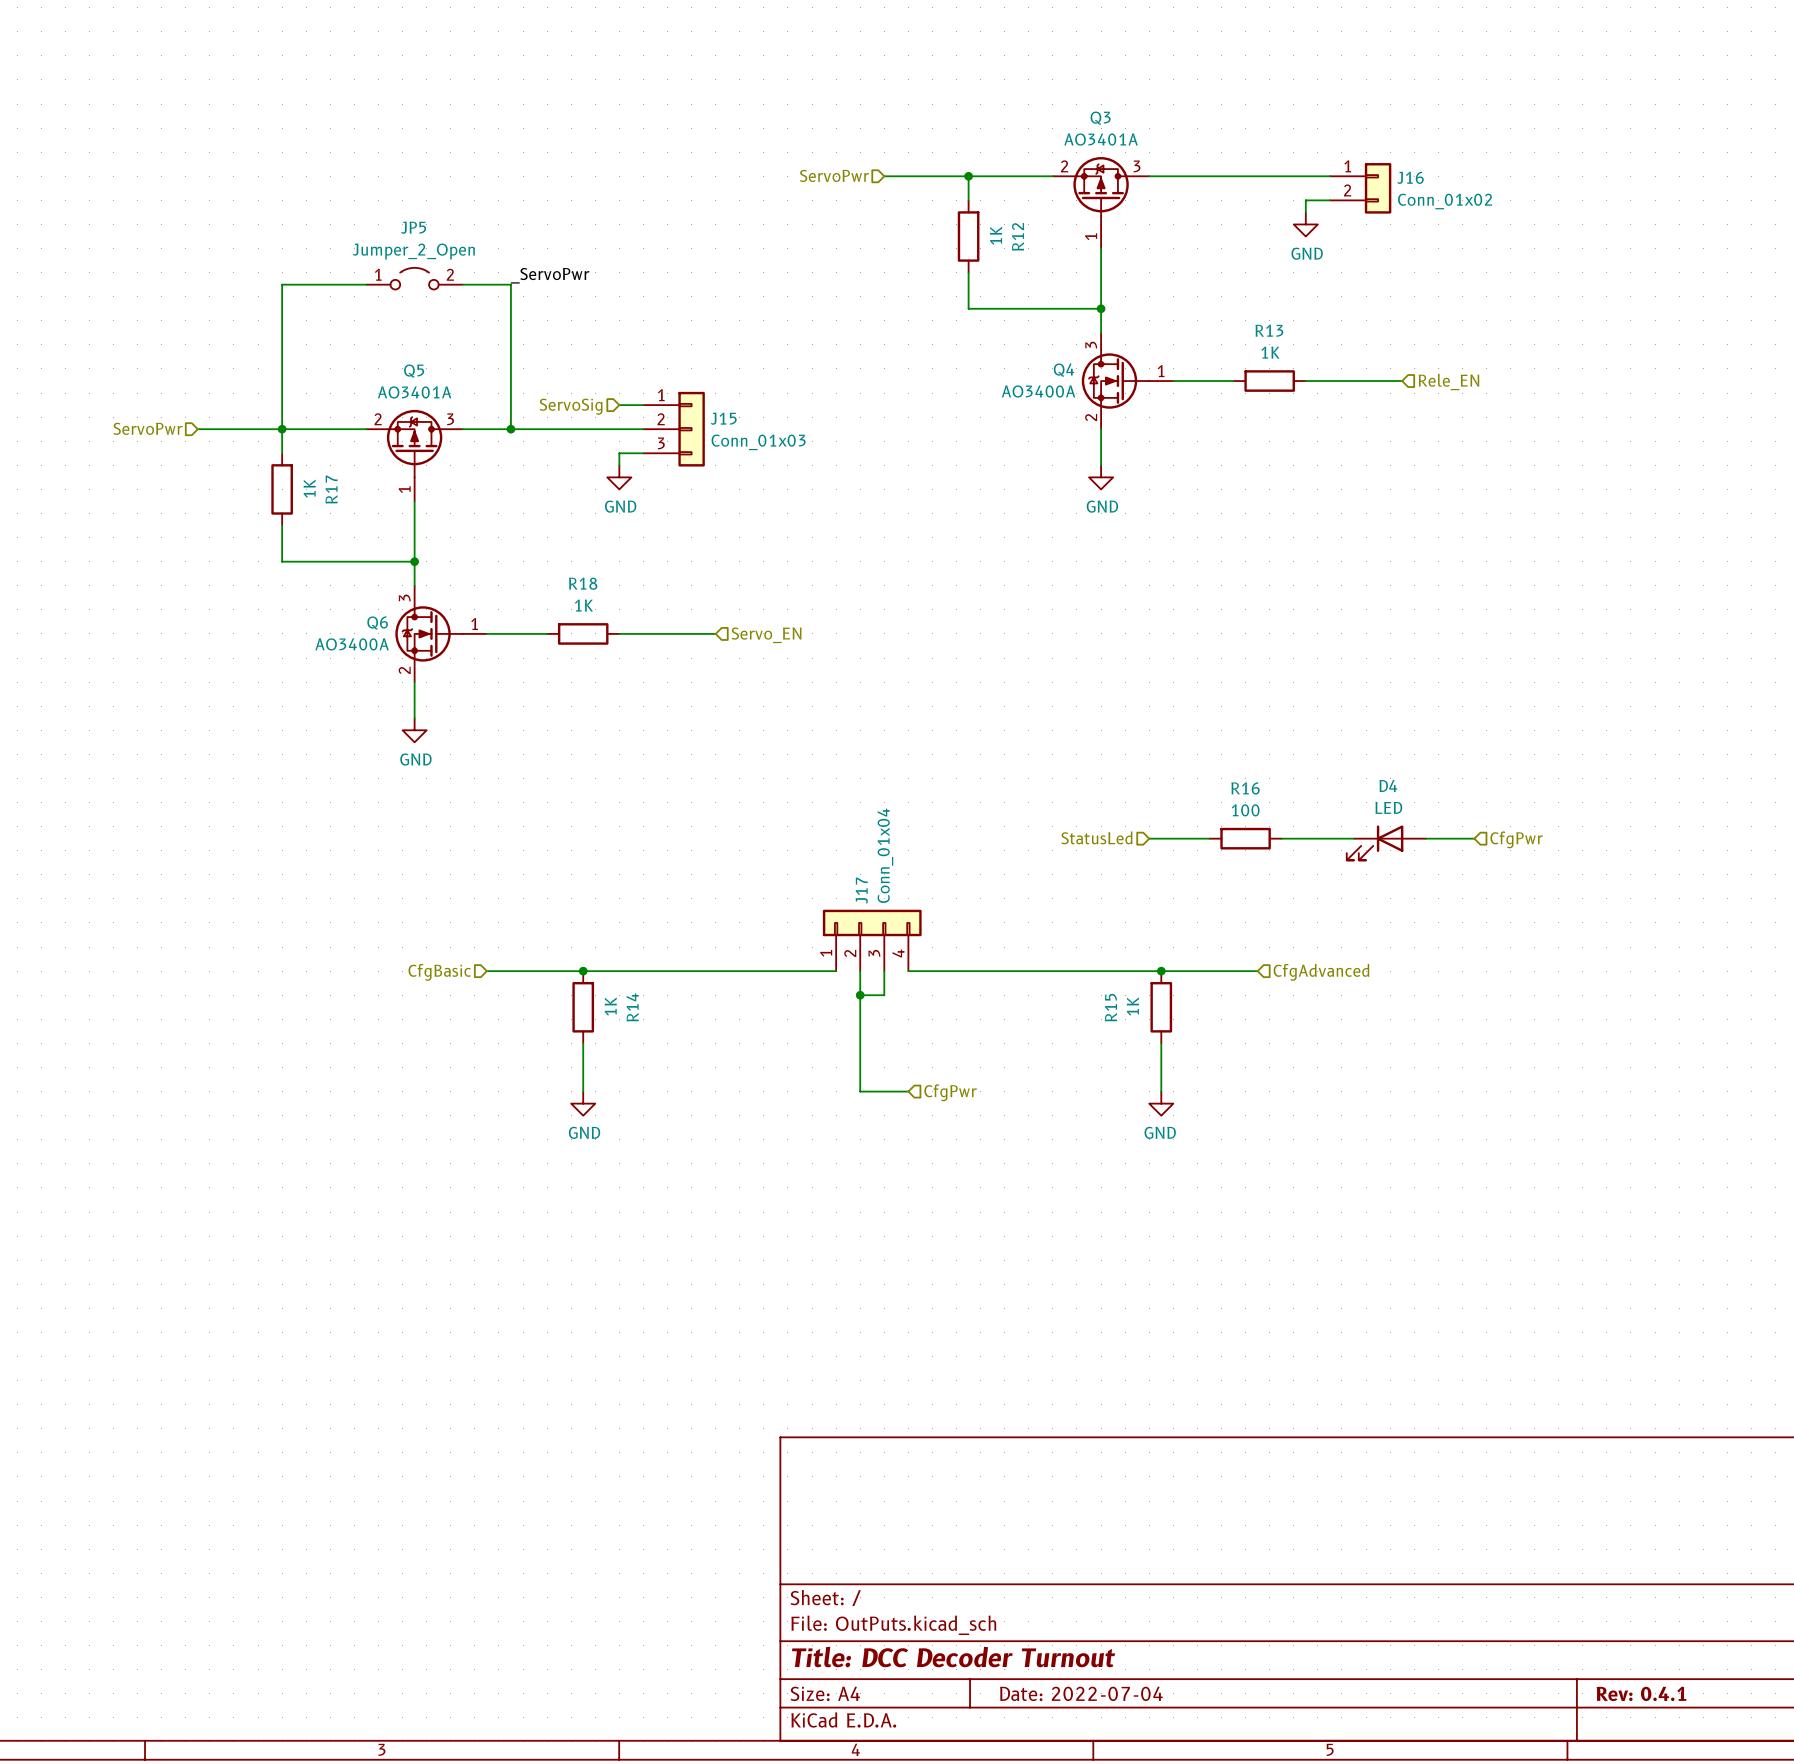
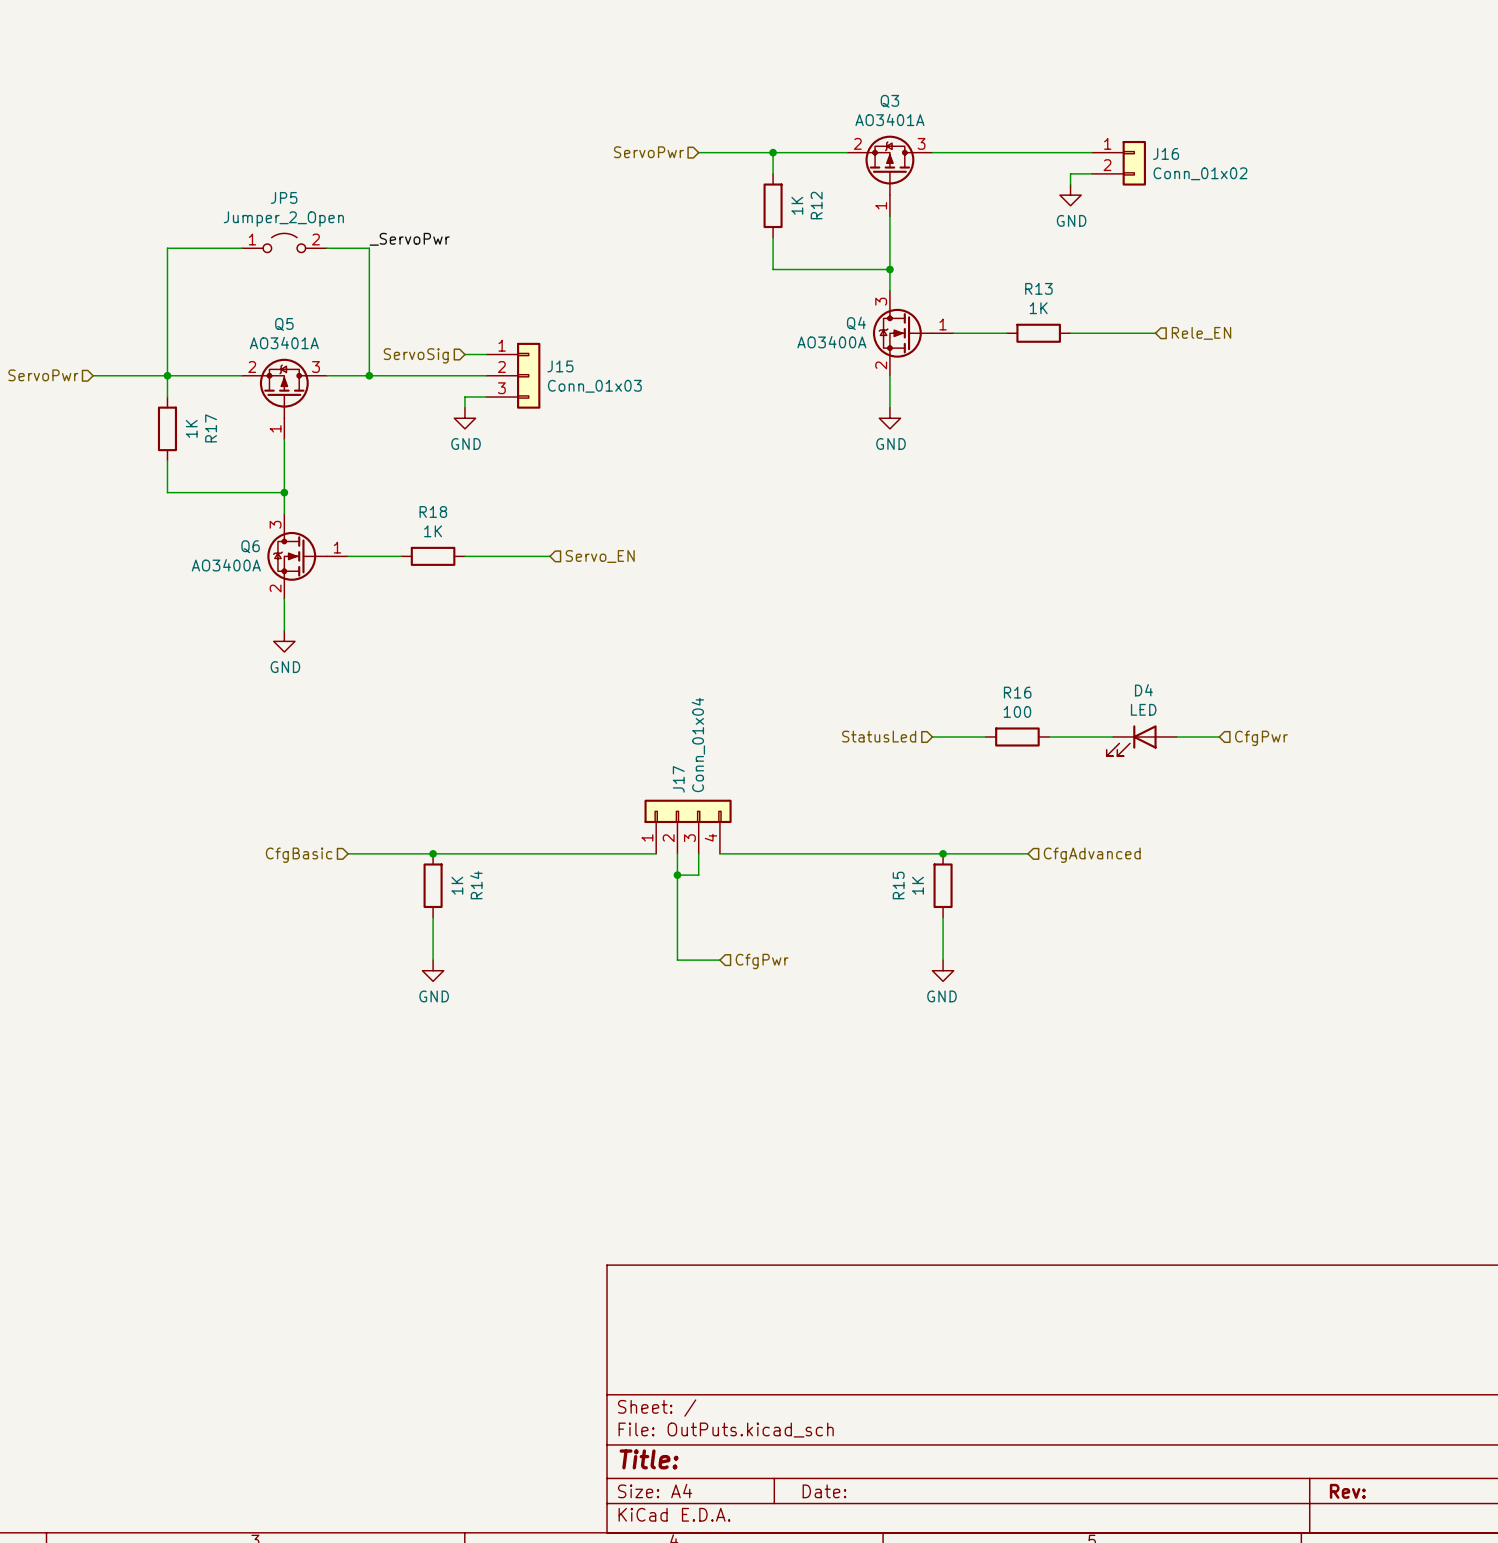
title block: Title: DCC Decoder Turnout (953, 1657) -> Title: (649, 1459)
title block: Date: 2022-07-04 (1081, 1693) -> Date: (824, 1491)
title block: Rev: 0.4.1 (1641, 1693) -> Rev: (1347, 1491)

